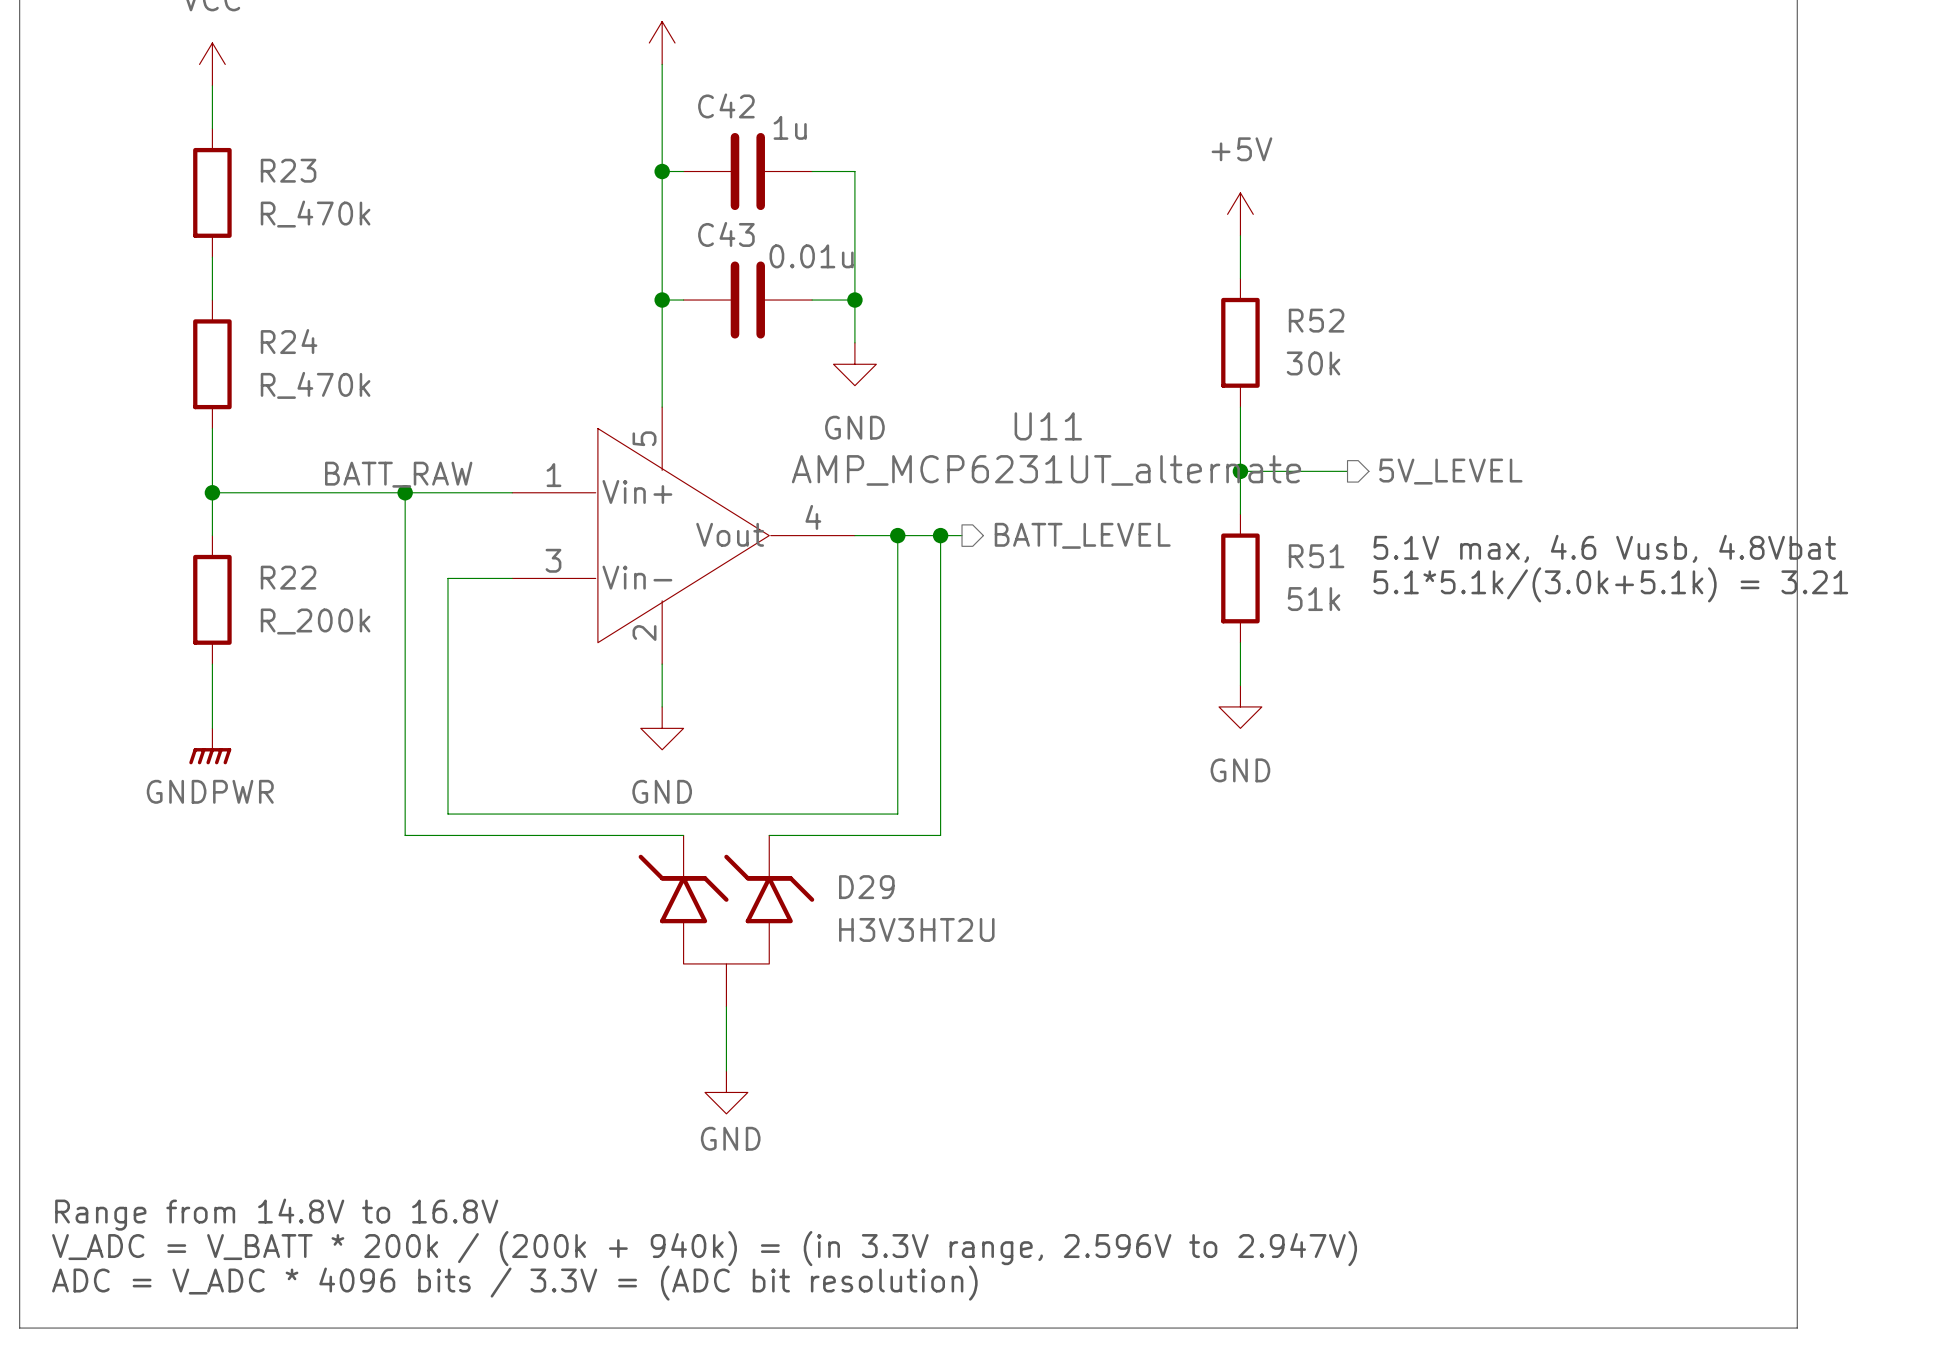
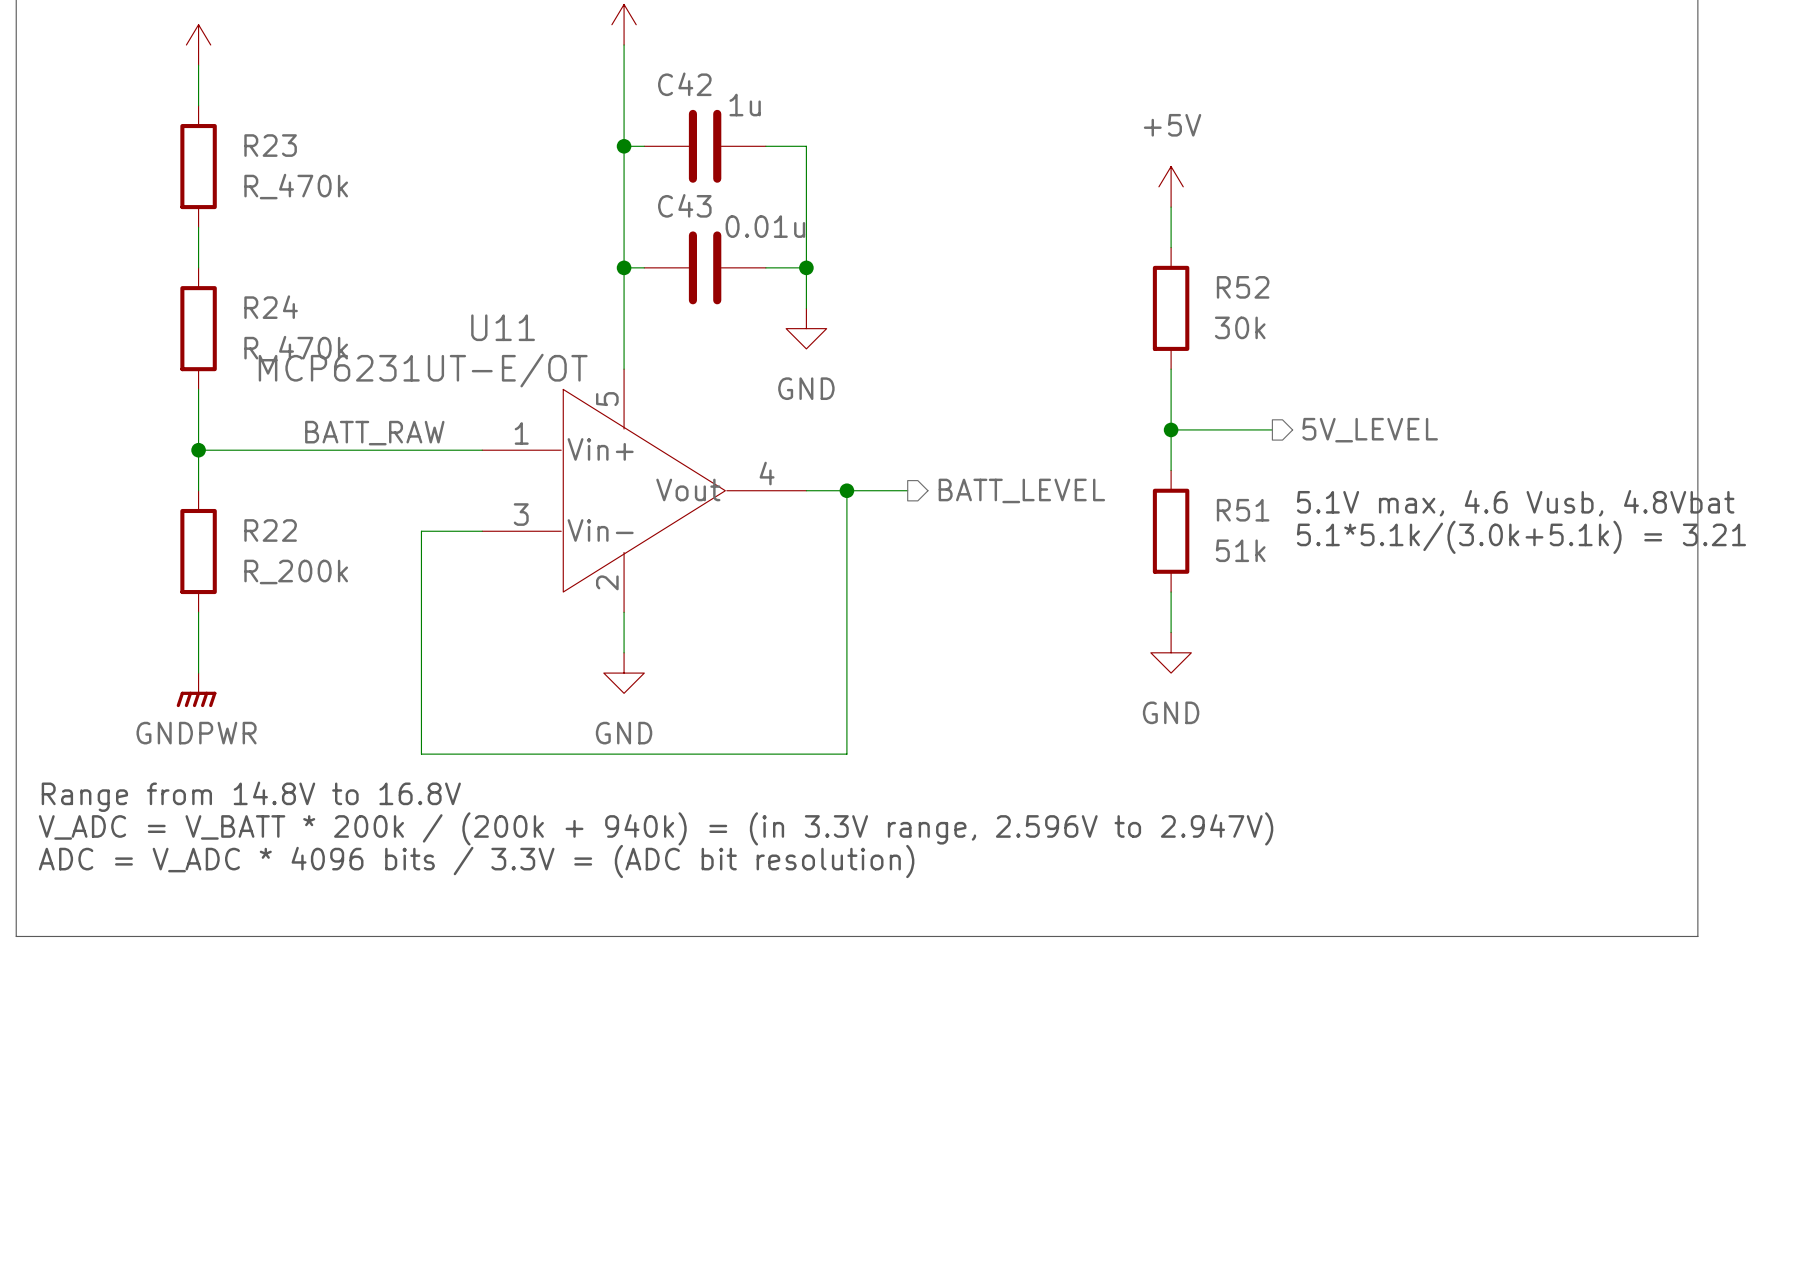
U11 name position: U11 (1048, 426) -> U11 (503, 327)
U11 value: AMP_MCP6231UT_alternate (1046, 470) -> MCP6231UT-E/OT (423, 370)
wire: (405, 492) (405, 835) (683, 835) -> none
junction: (405, 492) -> none
wire: (940, 535) (940, 835) (769, 835) -> none
junction: (940, 535) -> none
D29: H3V3HT2U (726, 921) -> none
line: (19, 1006) (19, 1328) (1797, 1328) (1797, 1006) -> (16, 936) (1697, 936)
wire: (726, 1006) (726, 1071) -> none
power symbol: GND (726, 1092) -> none
text position: Range from 14.8V to 16.8V (276, 1214) -> Range from 14.8V to 16.8V (251, 796)
text position: V_ADC = V_BATT * 200k / (200k + 940k) = (in 3.3V range, 2.596V to 2.947V) (704, 1248) -> V_ADC = V_BATT * 200k / (200k + 940k) = (in 3.3V range, 2.596V to 2.947V) (656, 828)
text position: ADC = V_ADC * 4096 bits / 3.3V = (ADC bit resolution) (514, 1283) -> ADC = V_ADC * 4096 bits / 3.3V = (ADC bit resolution) (476, 861)

